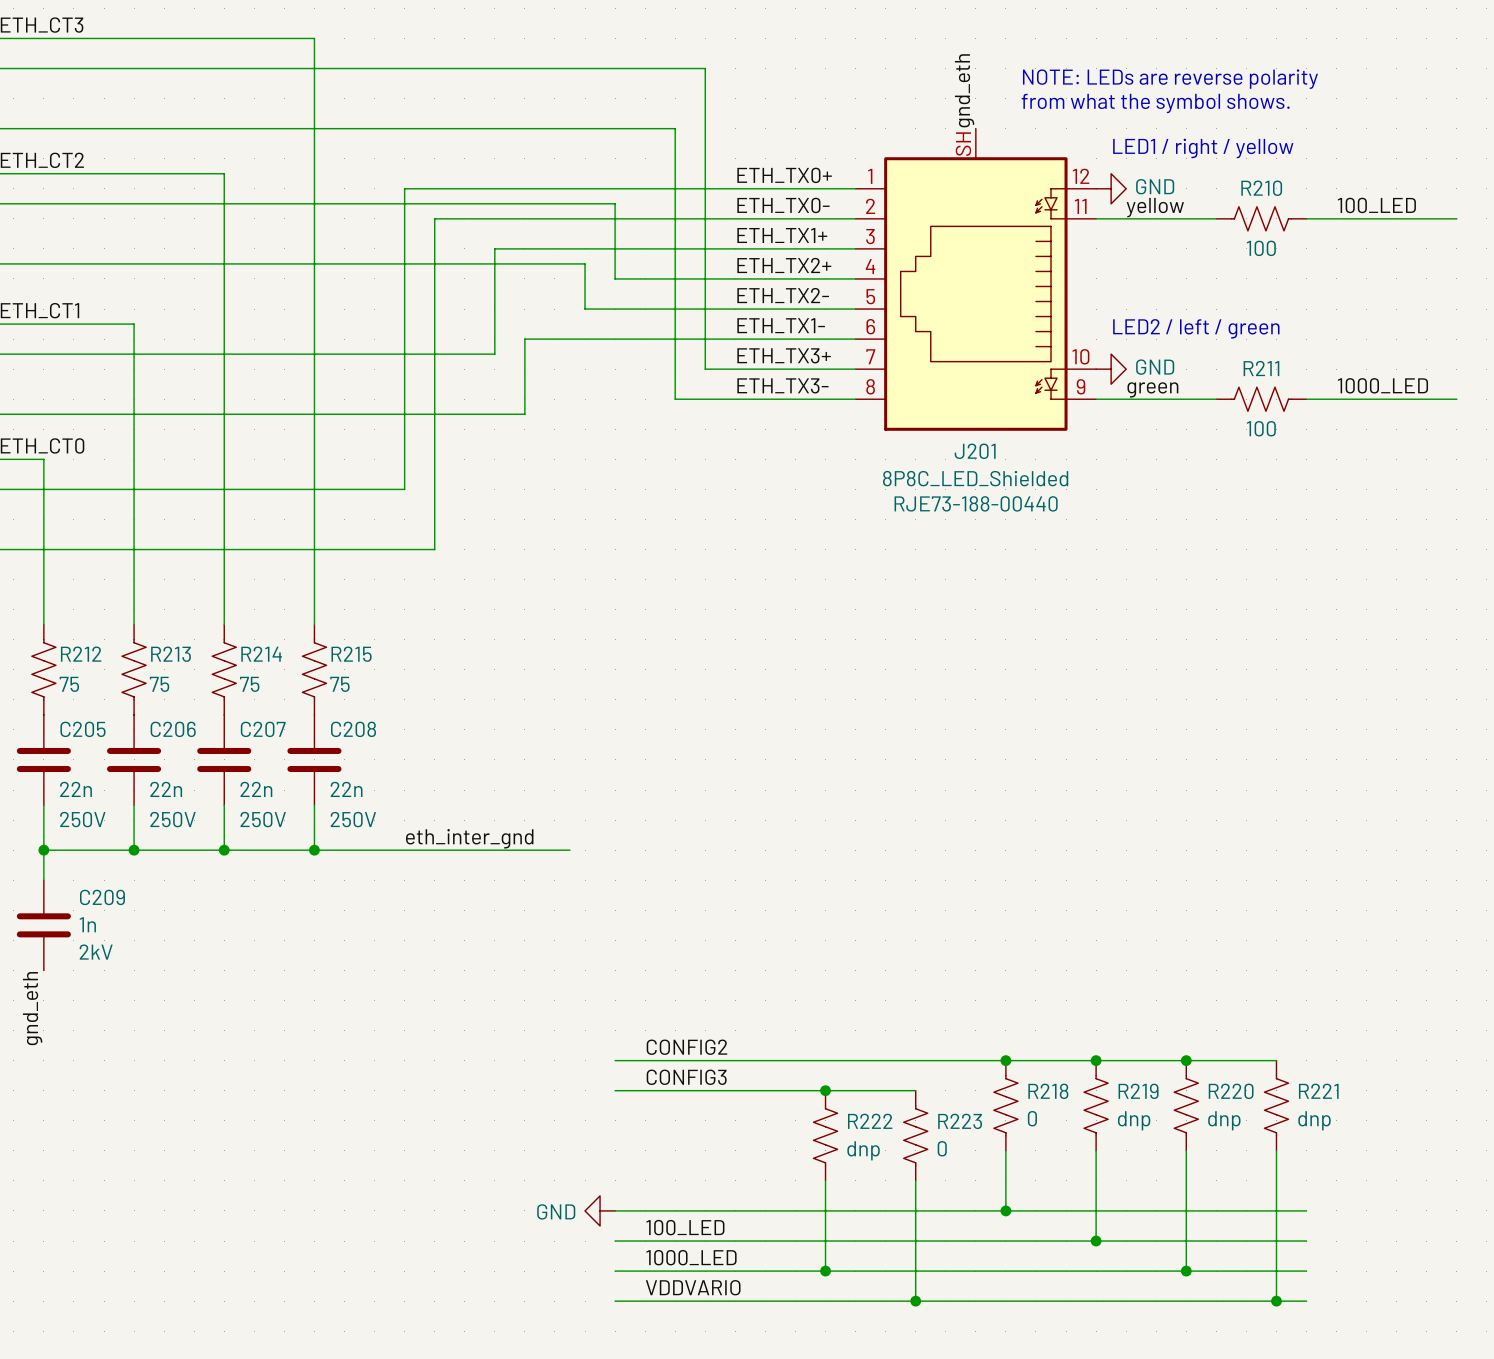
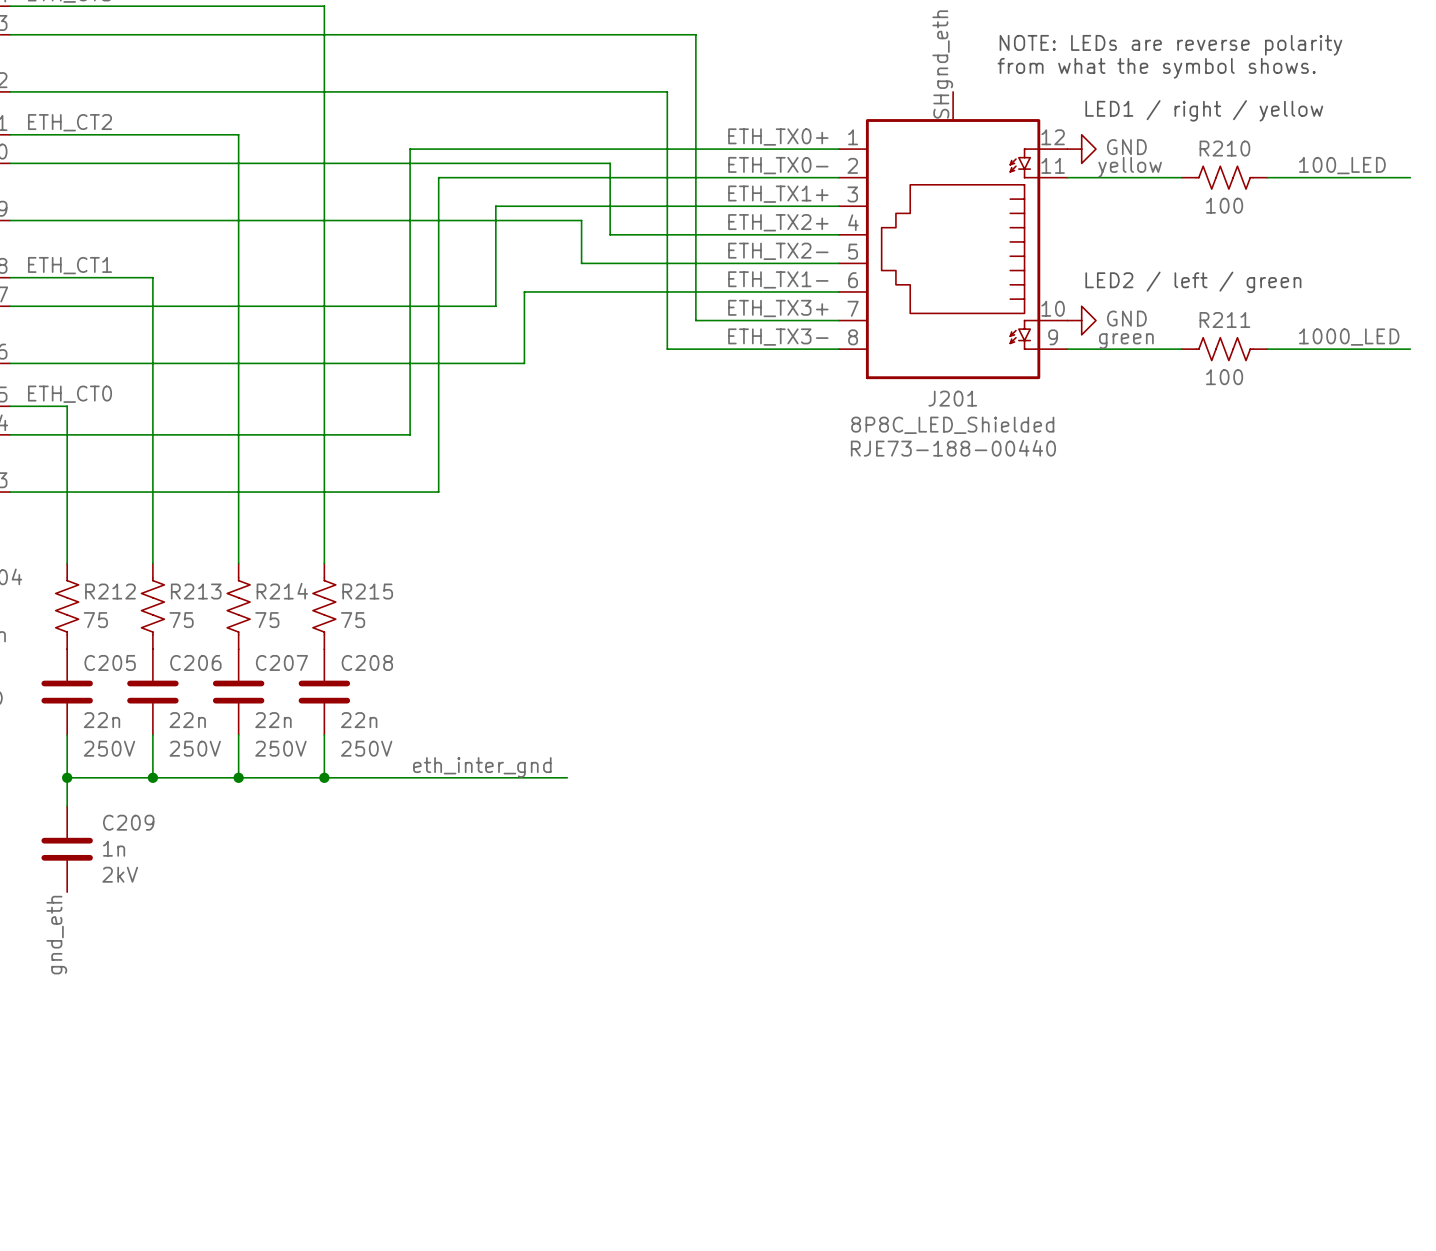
label: CONFIG2 (686, 1047) -> none
wire: (615, 1060) (1276, 1060) -> none
junction: (1005, 1060) -> none
junction: (1096, 1060) -> none
junction: (1186, 1060) -> none
label: CONFIG3 (686, 1077) -> none
wire: (615, 1090) (915, 1090) -> none
junction: (825, 1090) -> none
R218: 0 (1005, 1105) -> none
R219: dnp (1096, 1105) -> none
R220: dnp (1186, 1105) -> none
R221: dnp (1276, 1105) -> none
R222: dnp (825, 1135) -> none
R223: 0 (915, 1135) -> none
wire: (1005, 1150) (1005, 1210) -> none
wire: (1096, 1150) (1096, 1241) -> none
wire: (1186, 1150) (1186, 1271) -> none
wire: (1276, 1150) (1276, 1301) -> none
wire: (825, 1180) (825, 1271) -> none
wire: (915, 1180) (915, 1301) -> none
power symbol: GND (600, 1210) -> none
wire: (615, 1210) (1306, 1210) -> none
junction: (1005, 1210) -> none
label: 100_LED (685, 1227) -> none
wire: (615, 1241) (1306, 1241) -> none
junction: (1096, 1241) -> none
label: 1000_LED (691, 1257) -> none
wire: (615, 1271) (1306, 1271) -> none
junction: (825, 1271) -> none
junction: (1186, 1271) -> none
label: VDDVARIO (693, 1287) -> none
wire: (615, 1301) (1306, 1301) -> none
junction: (915, 1301) -> none
junction: (1276, 1301) -> none

